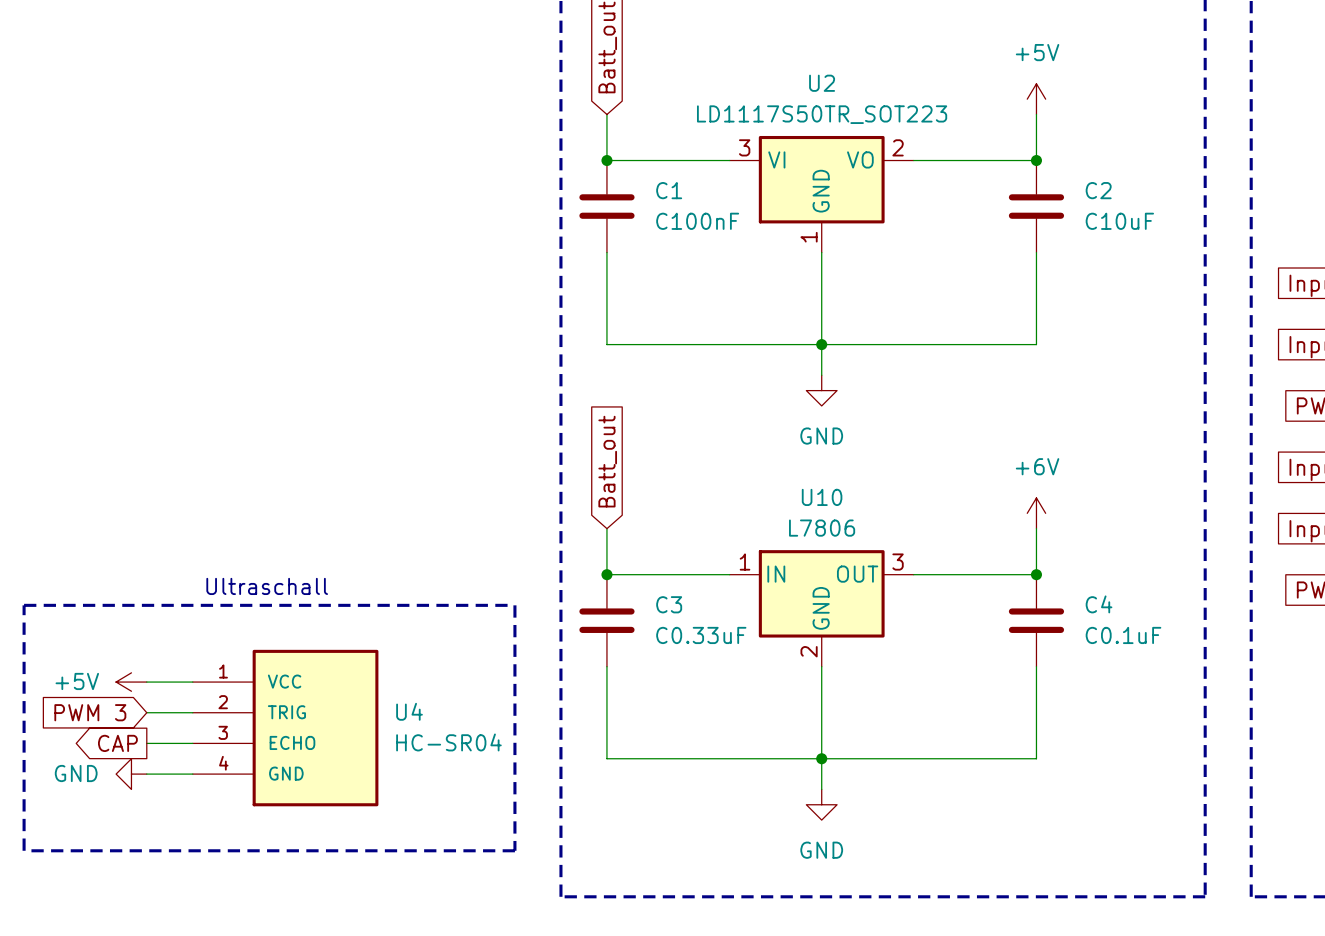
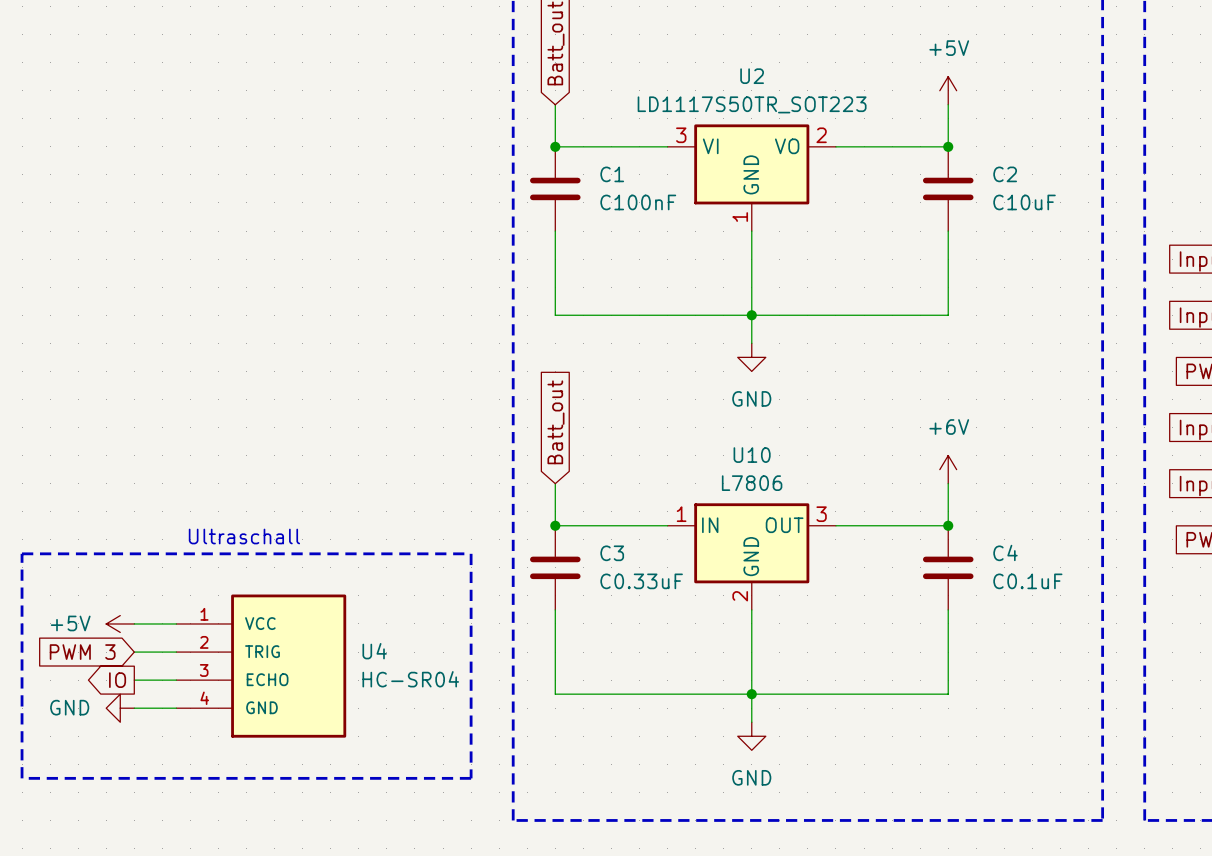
global label: CAP (117, 743) -> IO (117, 680)

